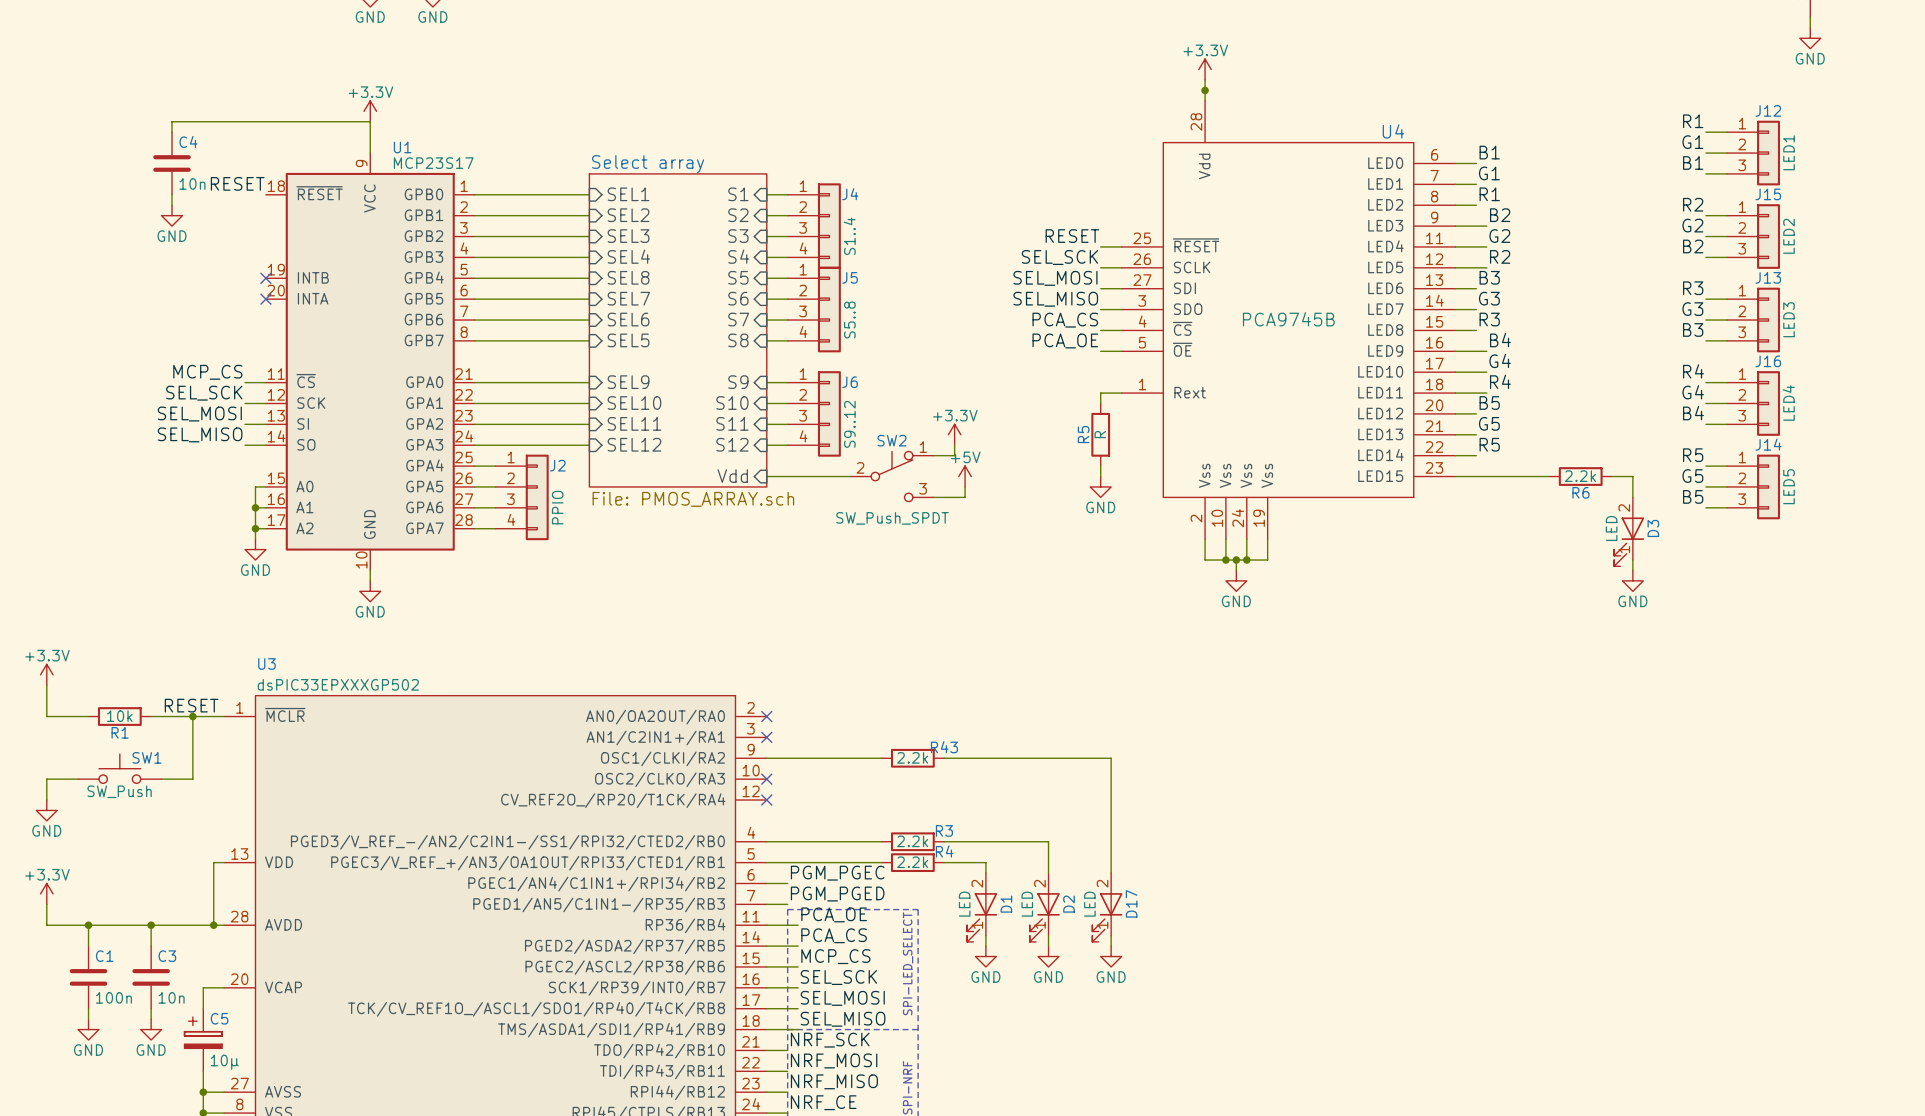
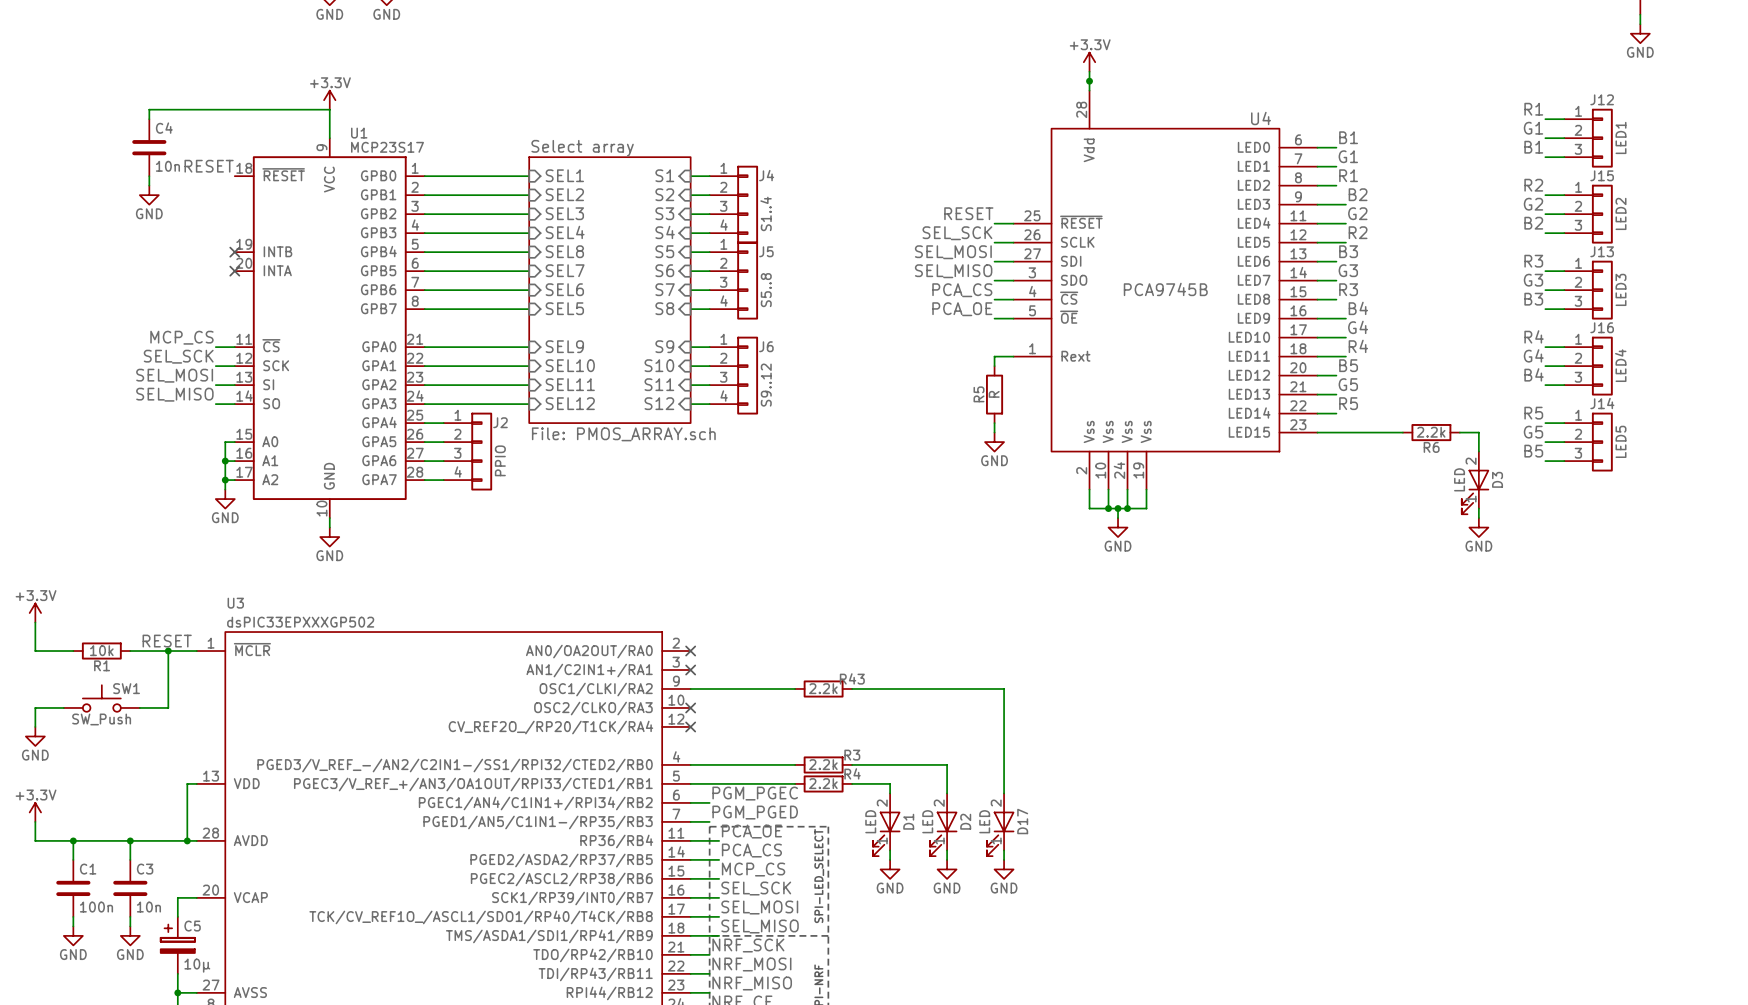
sheet Select array: none -> File: PMOS_ARRAY.sch (609, 290)
sheet Select array: File: PMOS_ARRAY.sch (678, 330) -> none
power symbol: +3.3V (954, 434) -> none
wire: (954, 445) (954, 455) (933, 455) -> none
sheet pin: Vdd (732, 476) -> none
wire: (766, 476) (850, 476) -> none
SW2: SW_Push_SPDT (892, 476) -> none
power symbol: +5V (965, 476) -> none
wire: (965, 486) (965, 497) (933, 497) -> none

